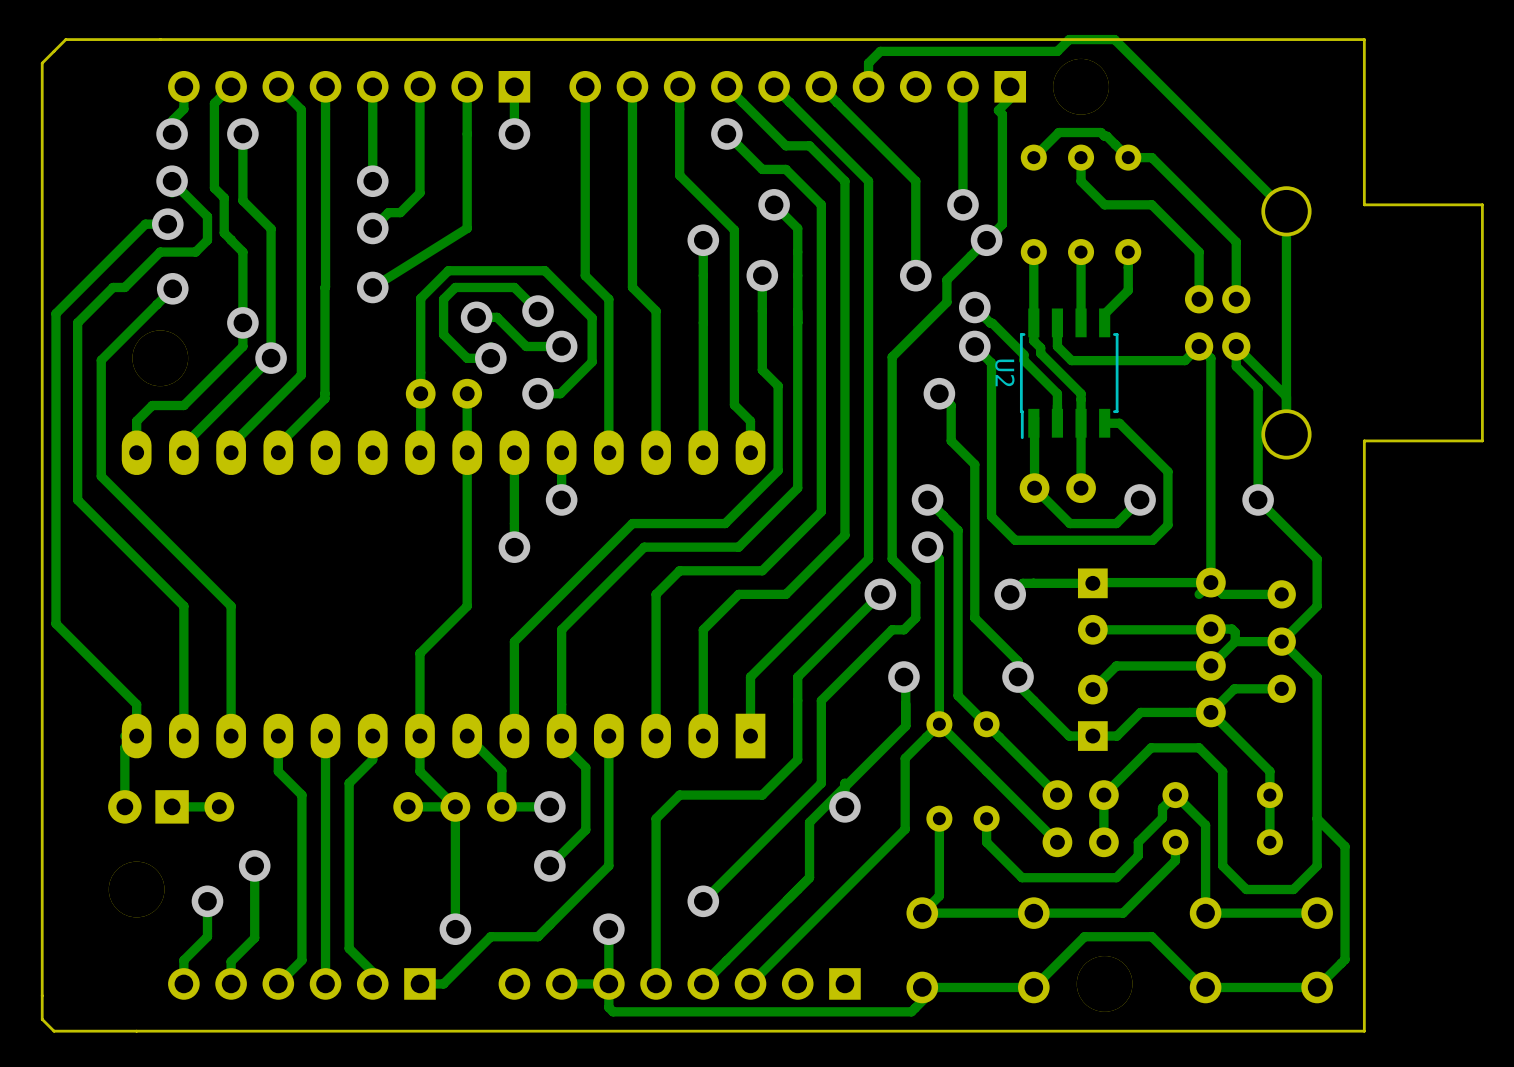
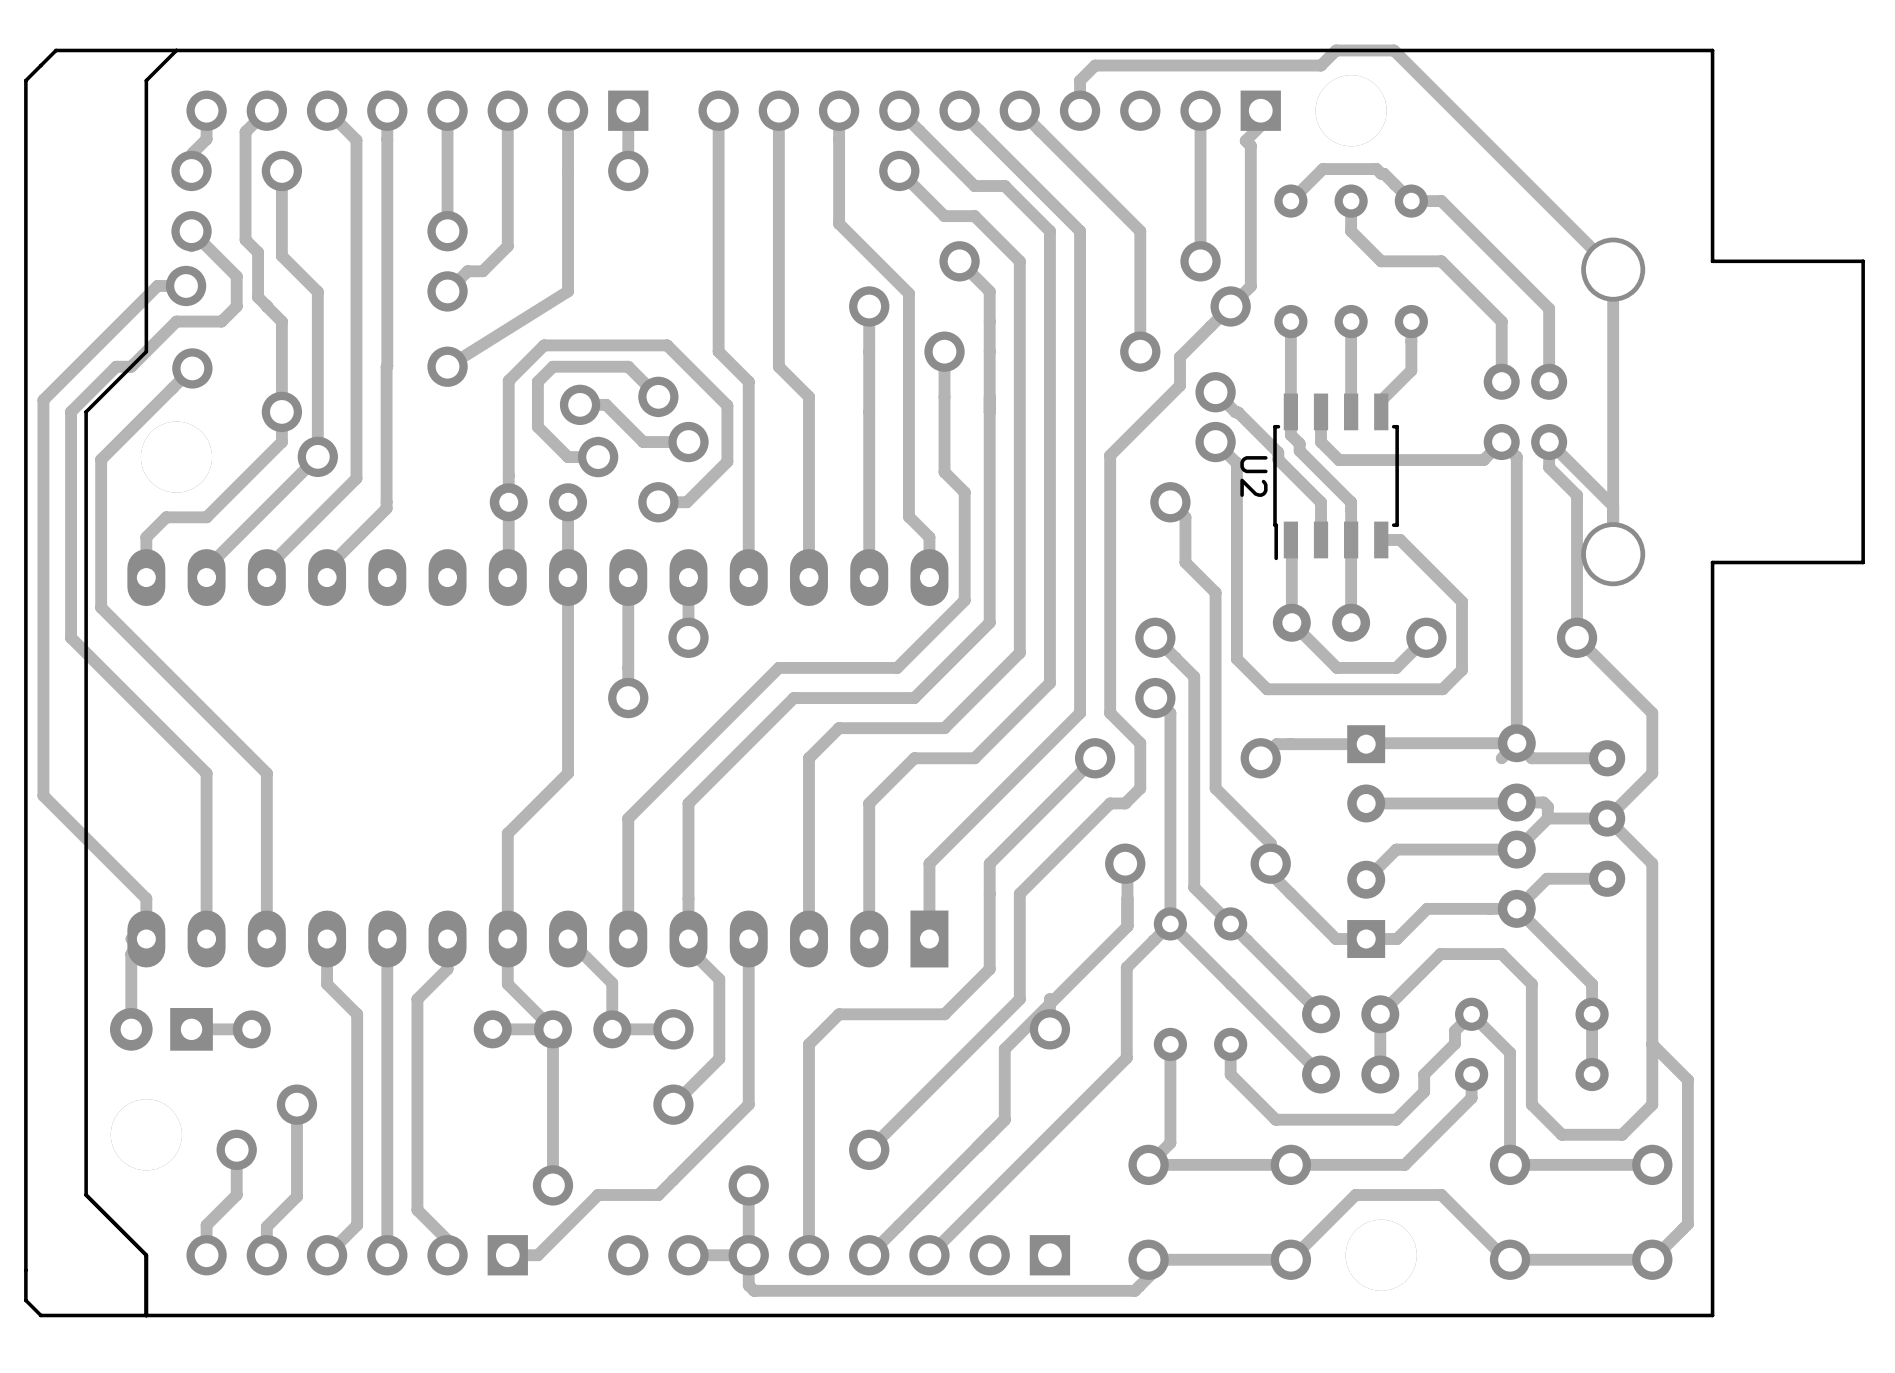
board edge: none -> (176, 50) (146, 80) (146, 351) (86, 411) (86, 1195) (146, 1255) (146, 1315)

